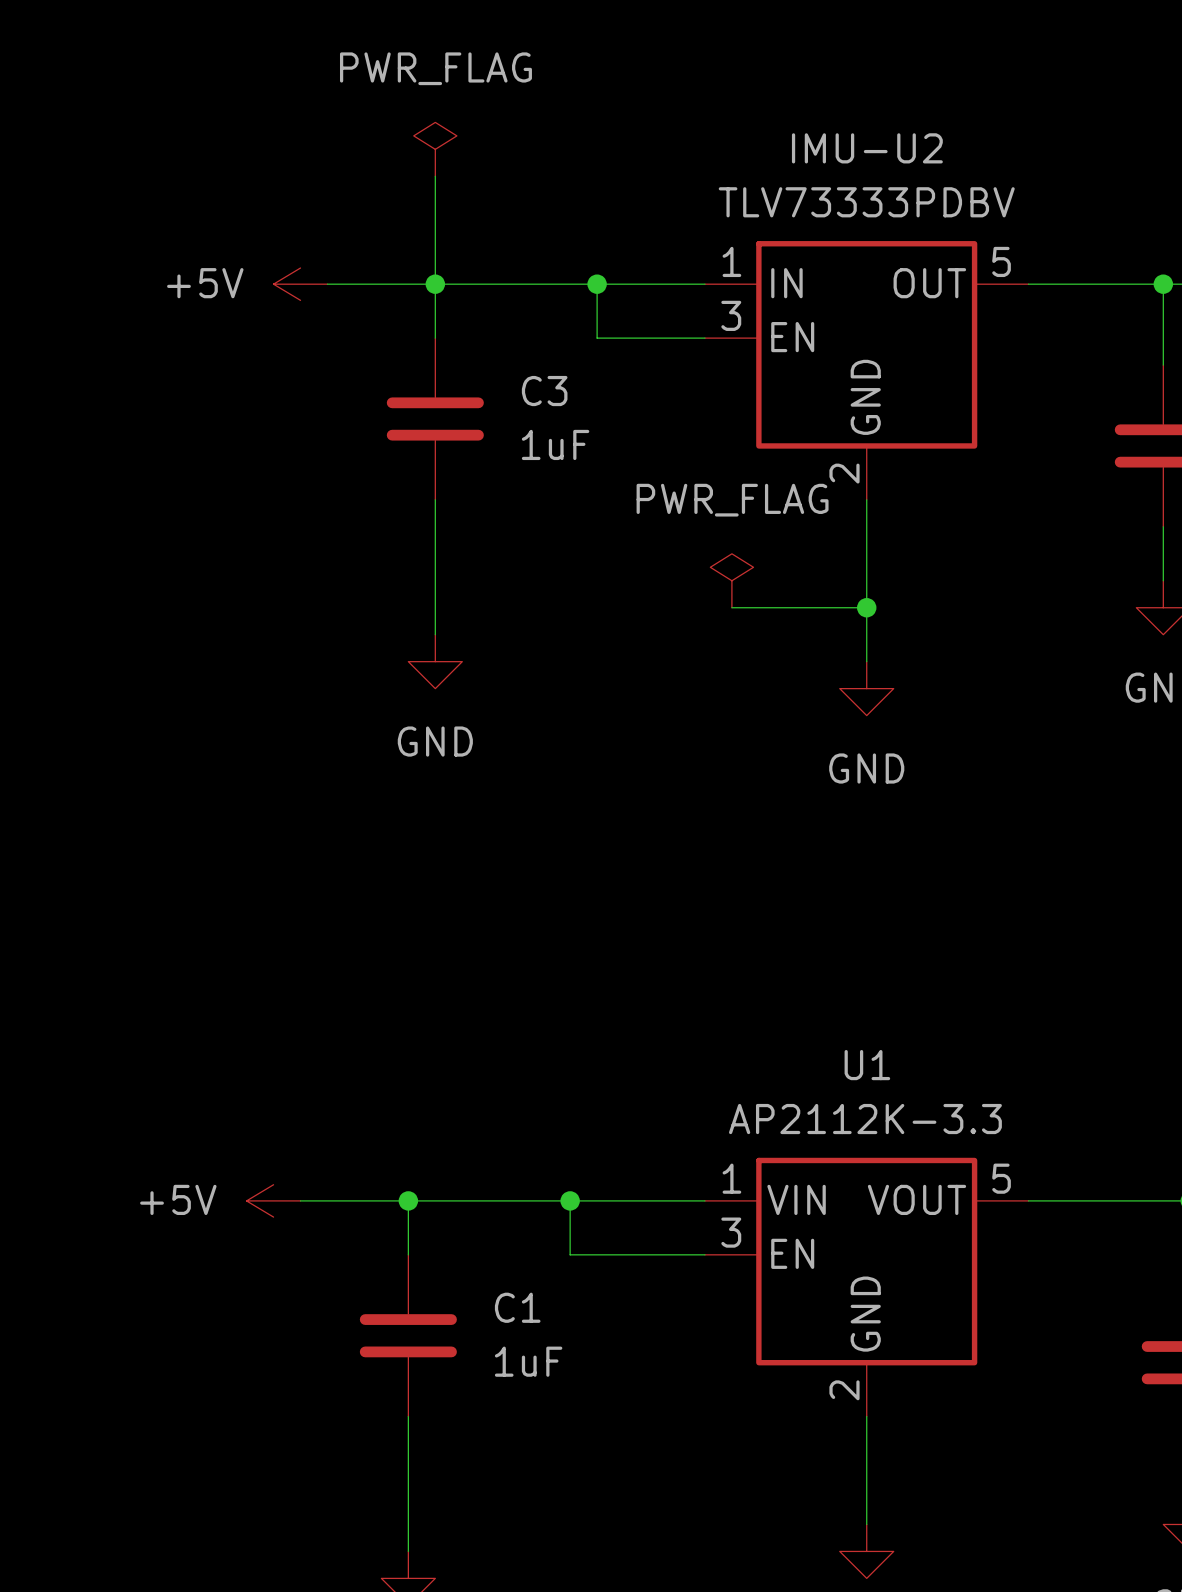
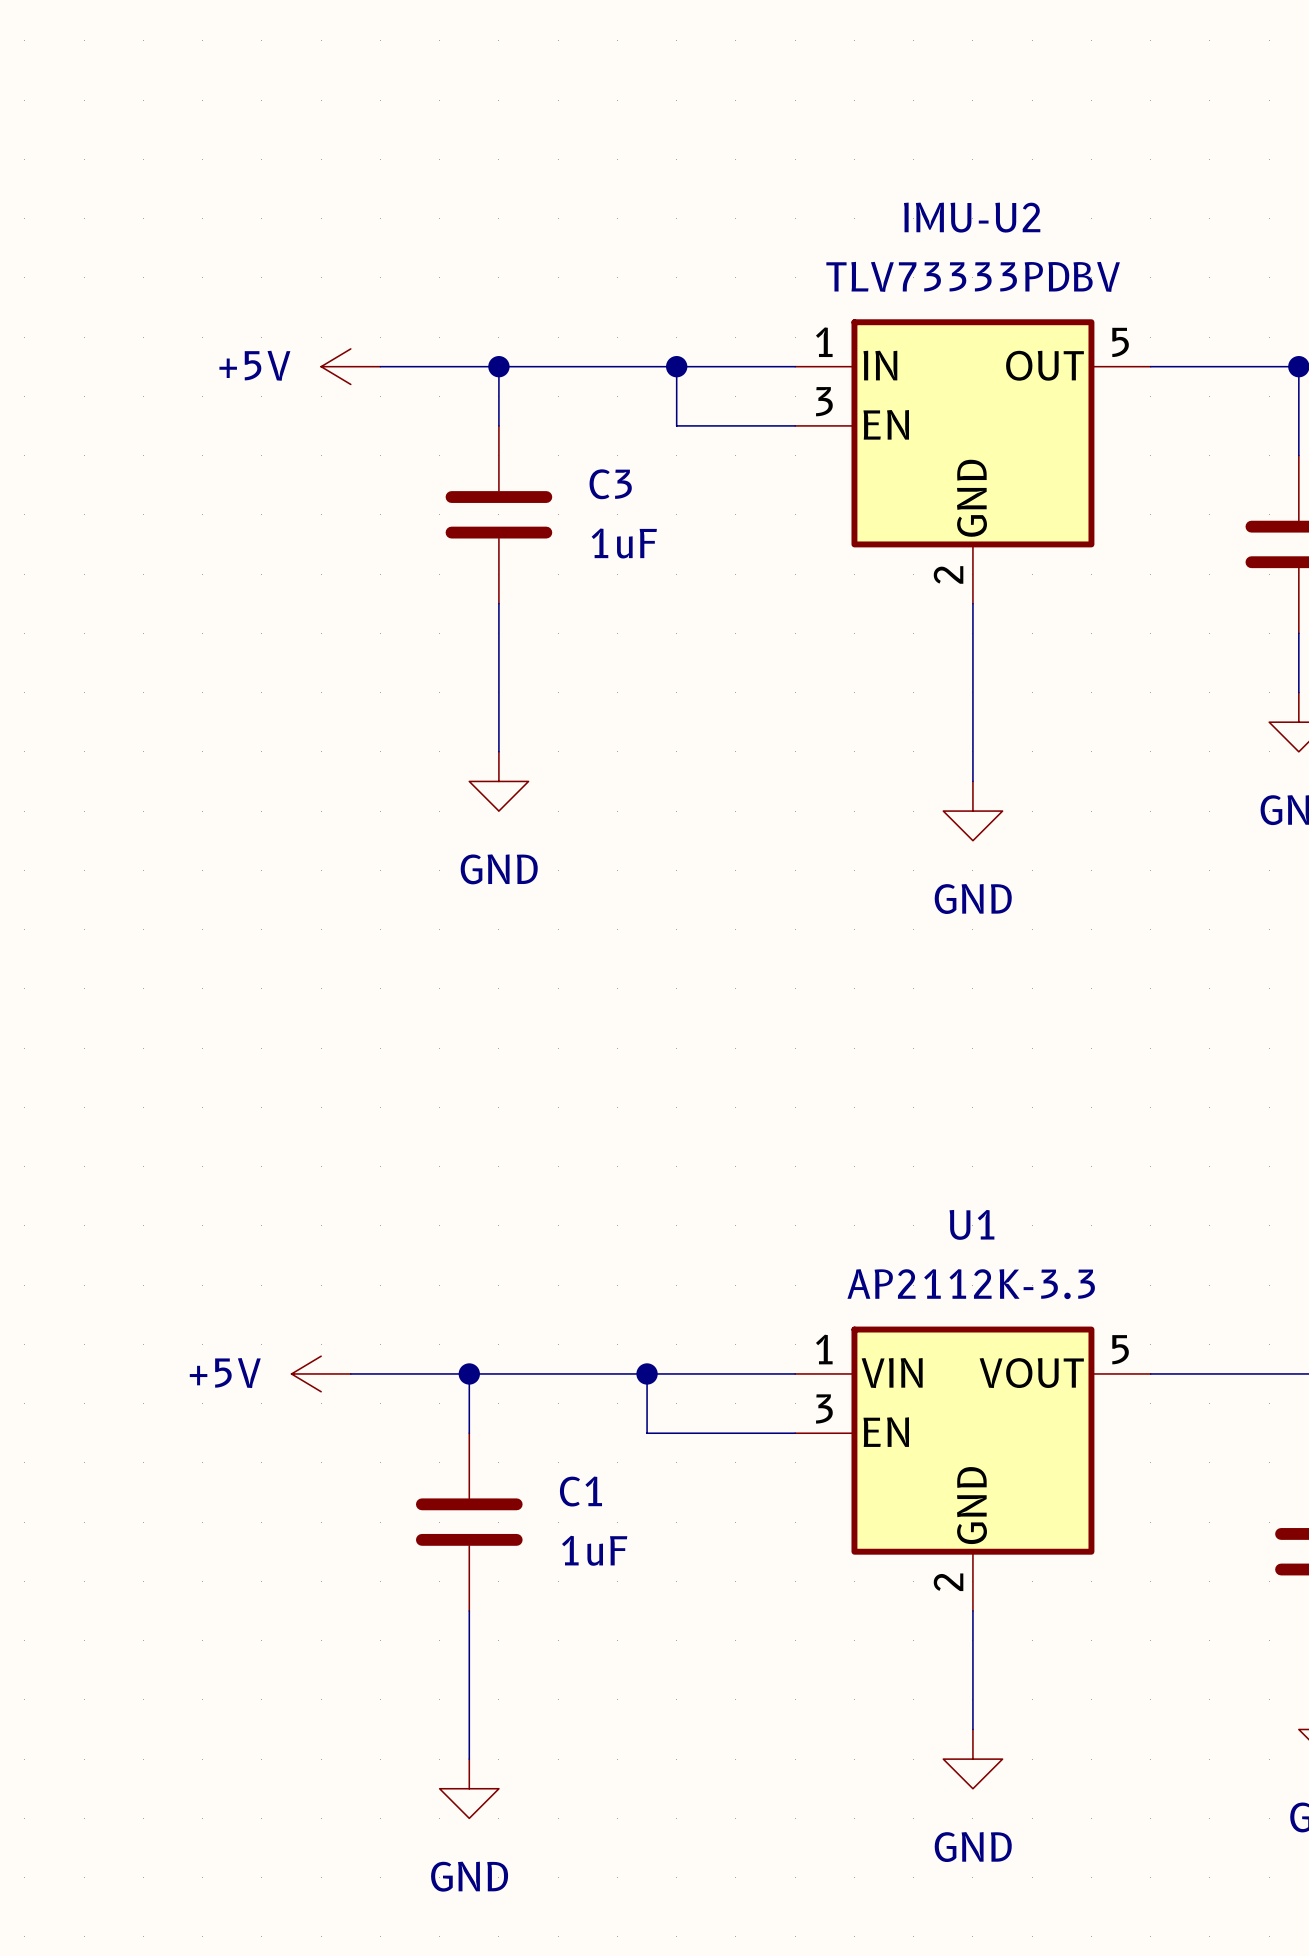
power symbol: PWR_FLAG (435, 149) -> none
wire: (435, 176) (435, 284) -> none
power symbol: PWR_FLAG (731, 580) -> none
wire: (731, 607) (866, 607) -> none
junction: (866, 607) -> none

